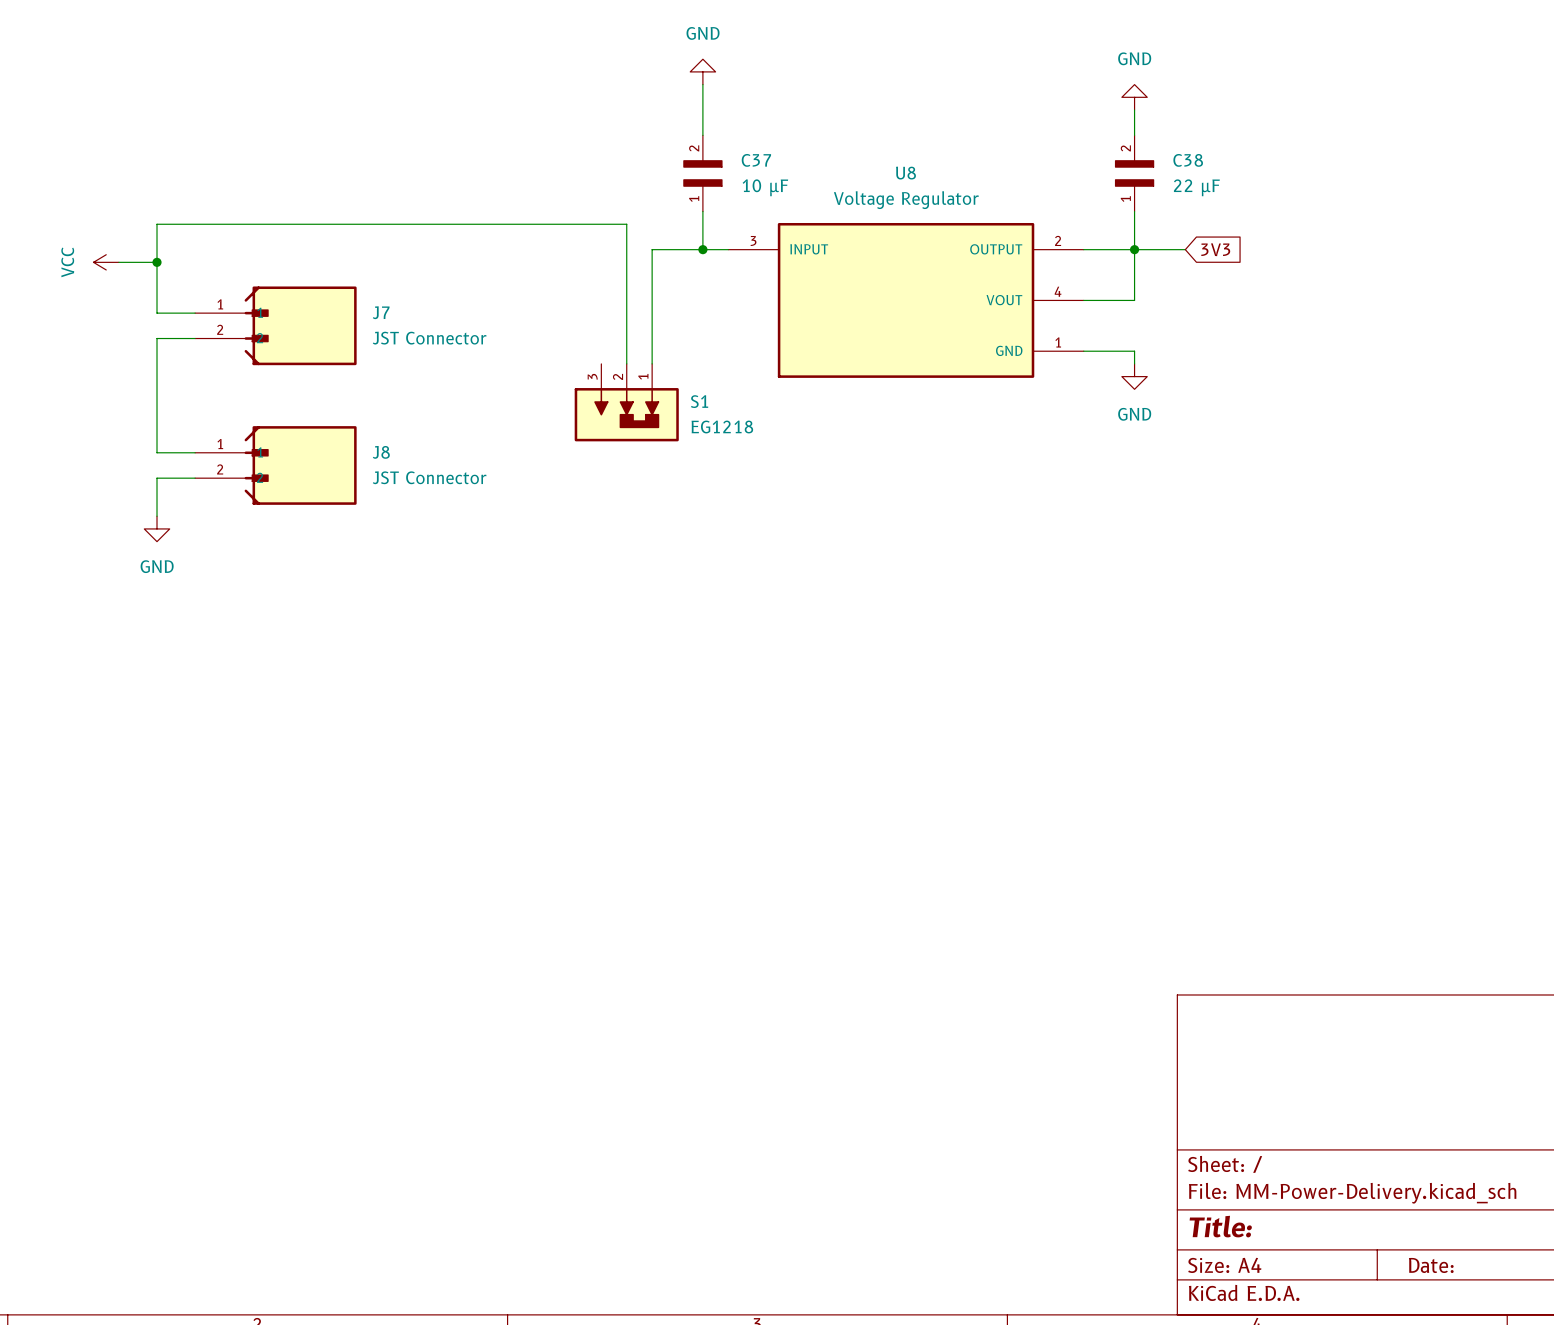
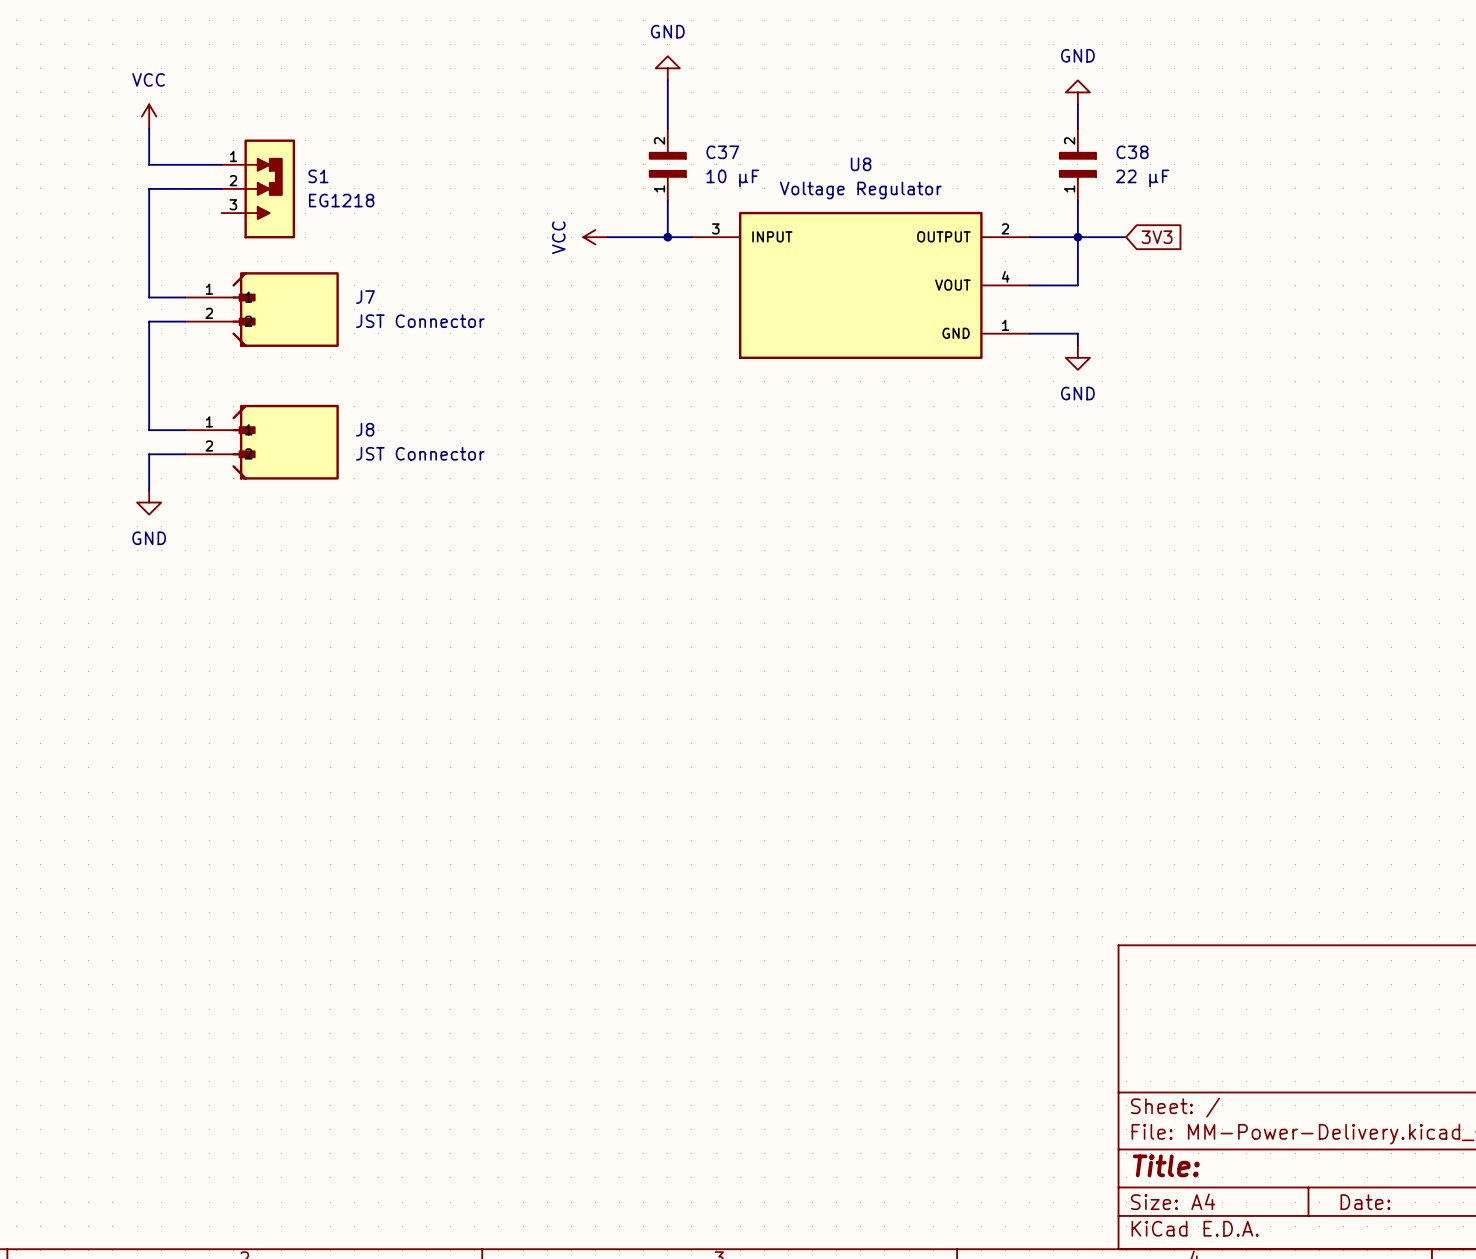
wire: none -> (149, 128) (149, 164) (221, 164)
wire: (157, 224) (626, 224) (626, 363) -> (149, 213) (149, 188) (221, 188)
power symbol: none -> VCC (595, 237)
wire: (652, 249) (652, 363) -> (619, 237) (607, 237)
power symbol rotation: 0° (106, 262) -> 90° clockwise (149, 116)
power symbol position: VCC (106, 262) -> VCC (149, 116)
wire: (118, 262) (157, 262) -> none
junction: (157, 262) -> none
S1 position: (626, 402) -> (258, 188)
S1 rotation: 0° (626, 414) -> 90° counterclockwise (269, 188)

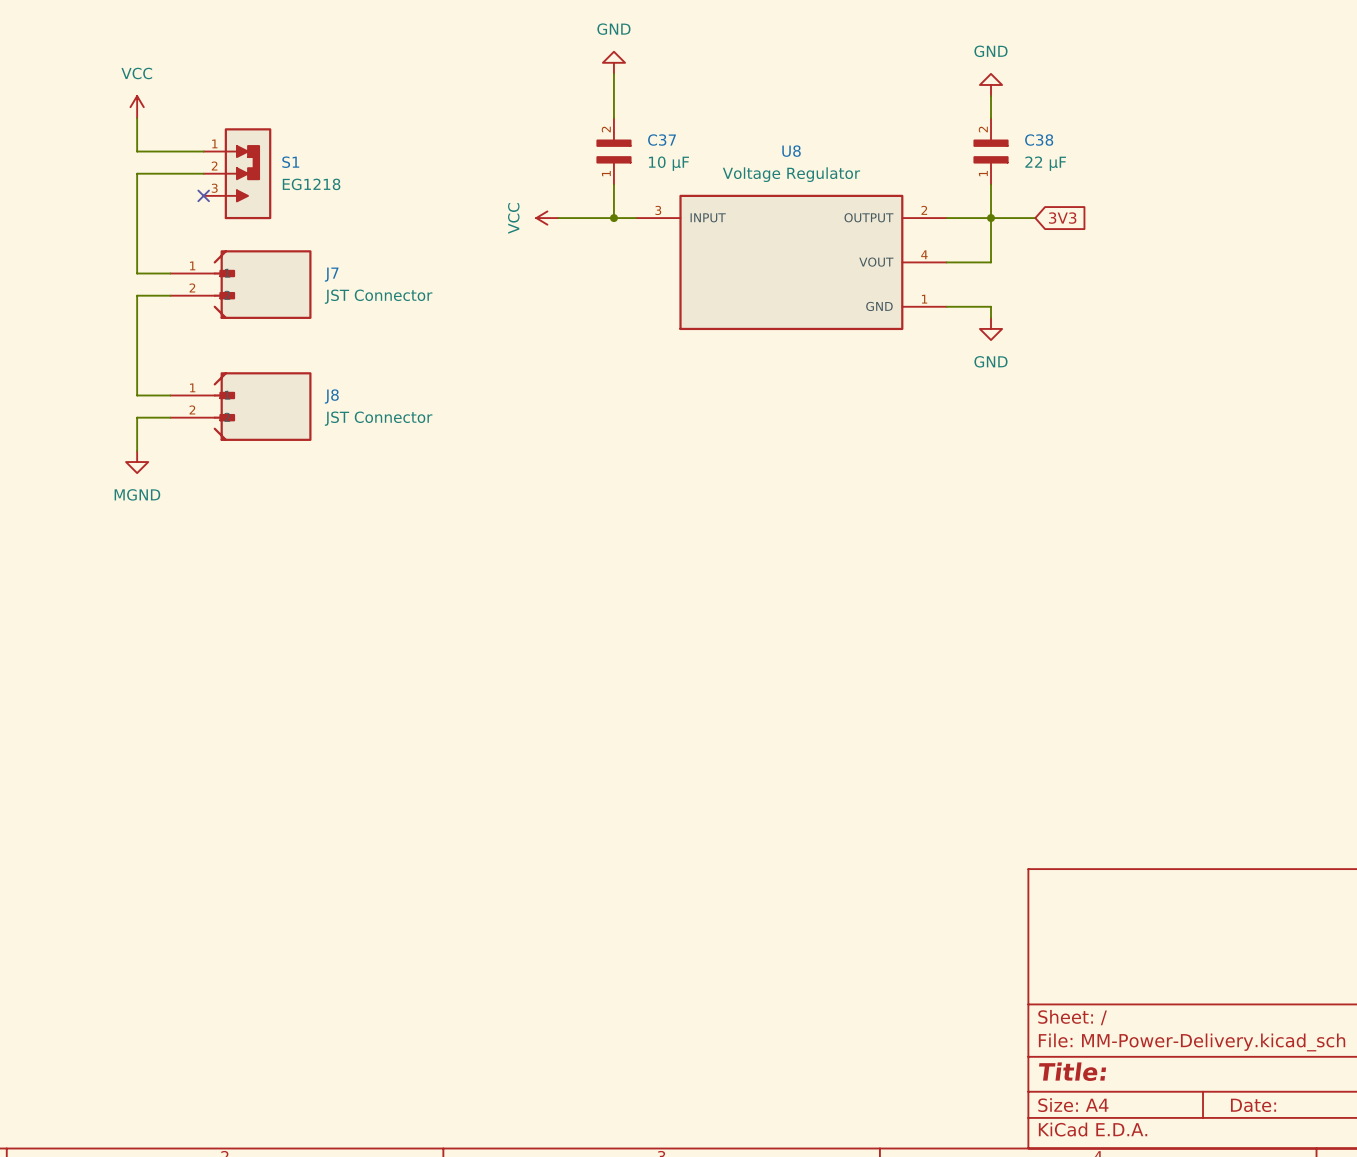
no-connect mark: none -> (203, 195)
power symbol: GND (149, 502) -> MGND (137, 462)

